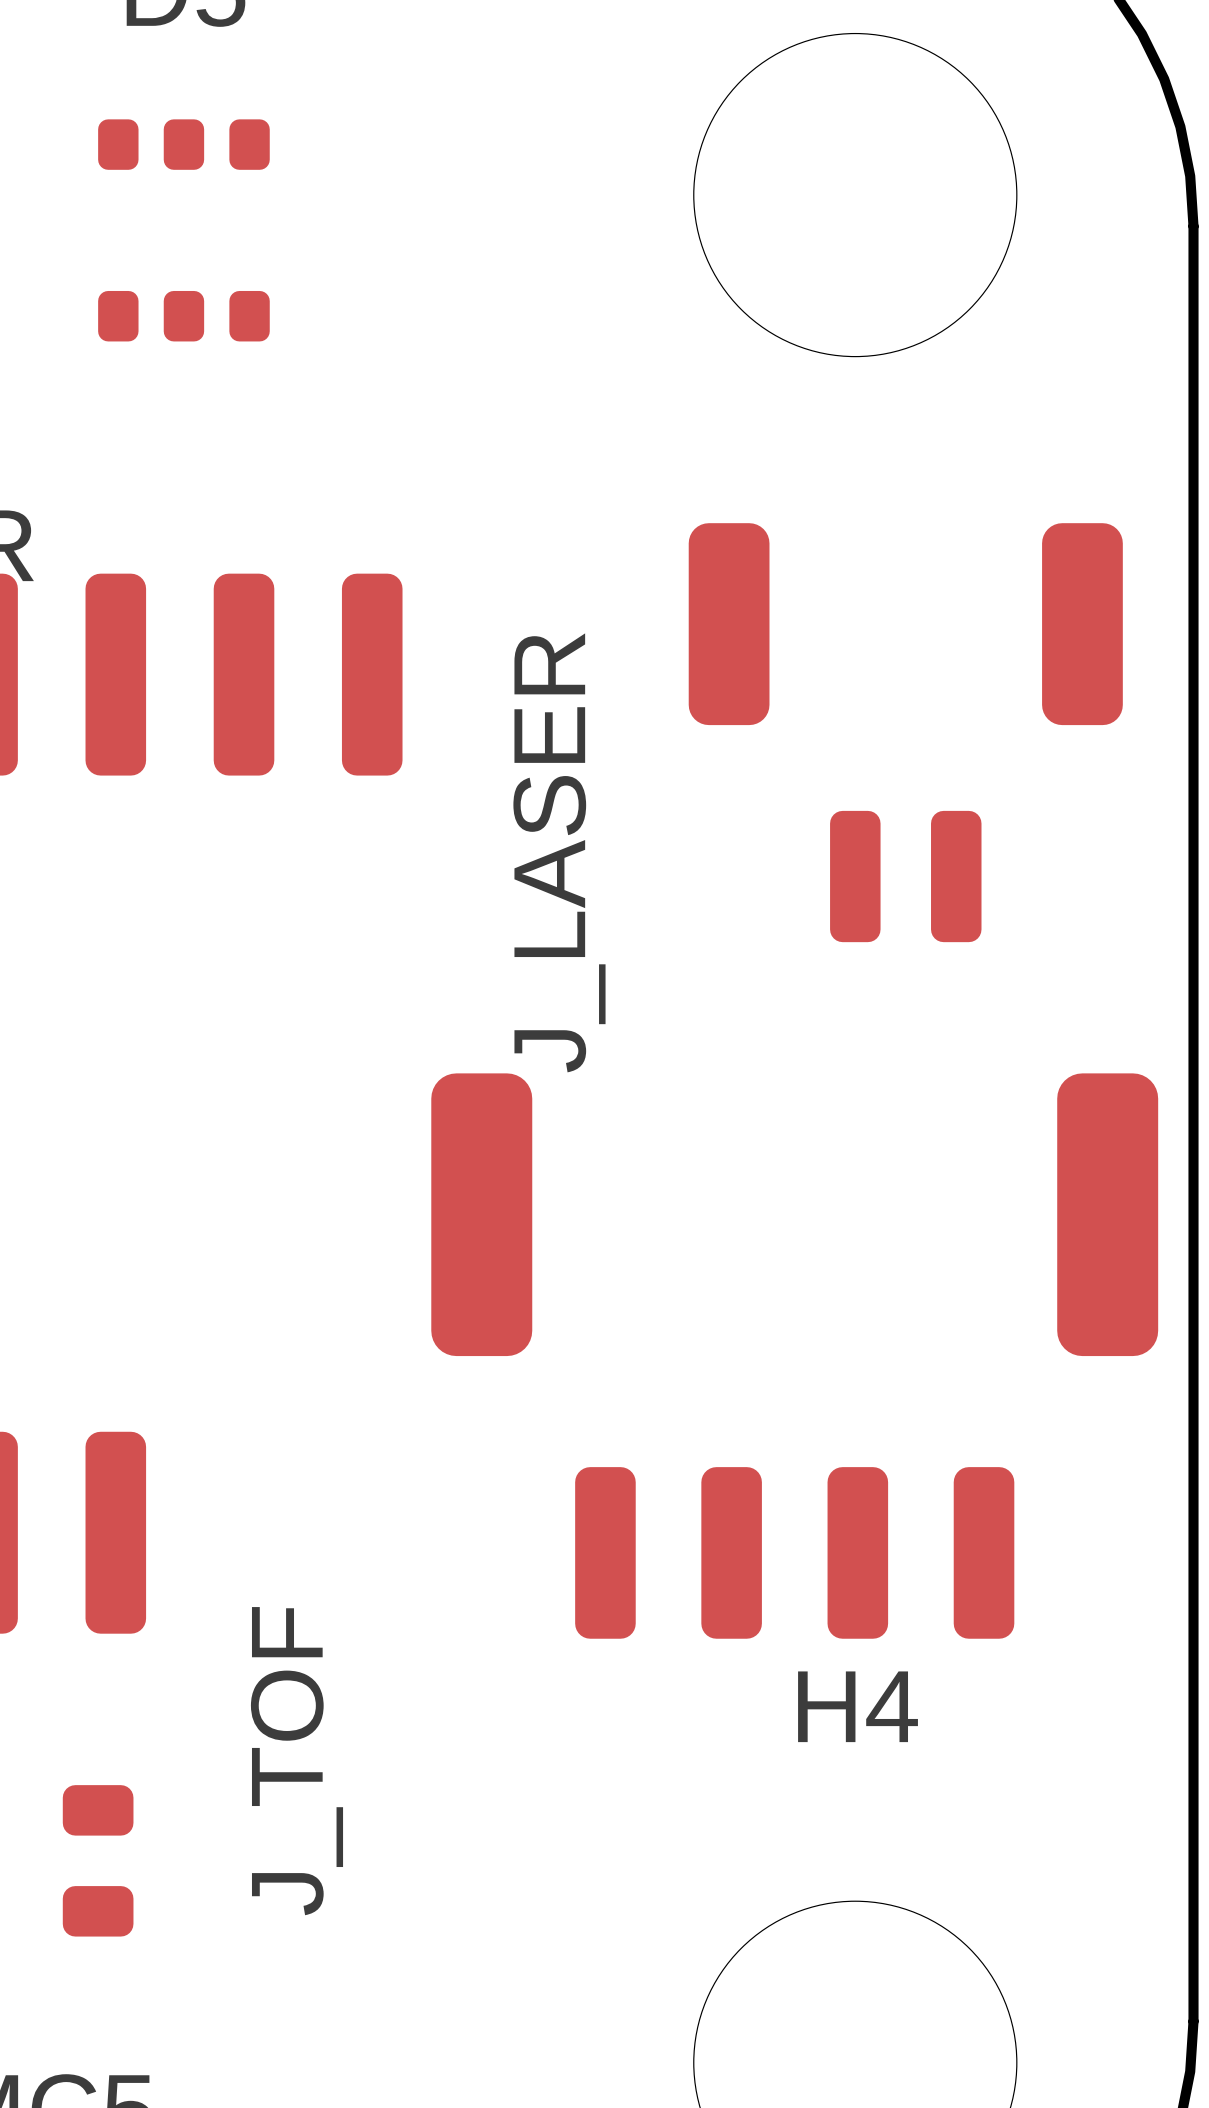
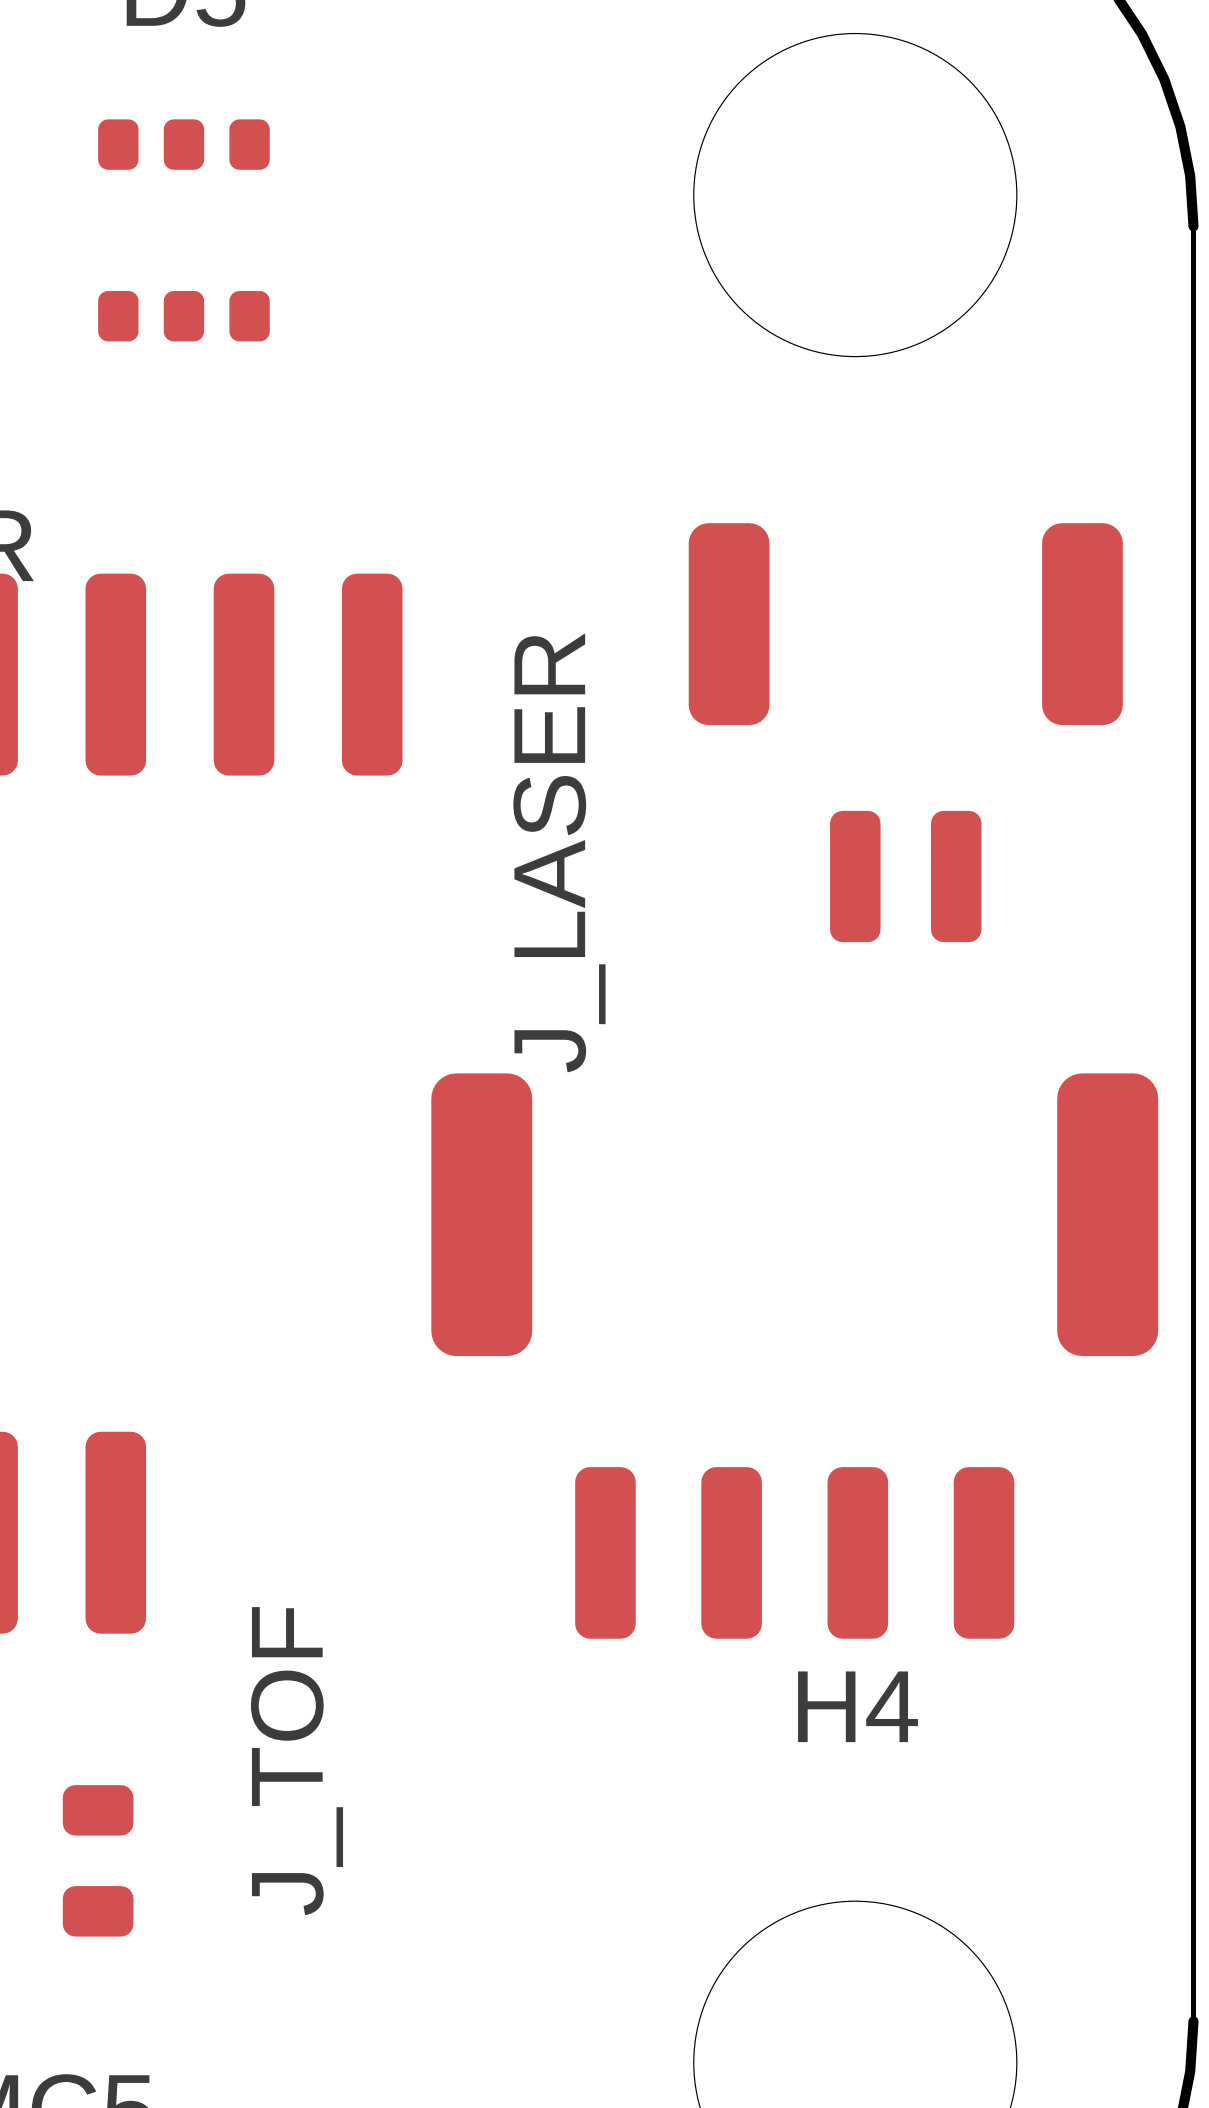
board edge width: thick (1193, 226) (1193, 2021) -> thin (1193, 226) (1193, 2021)

